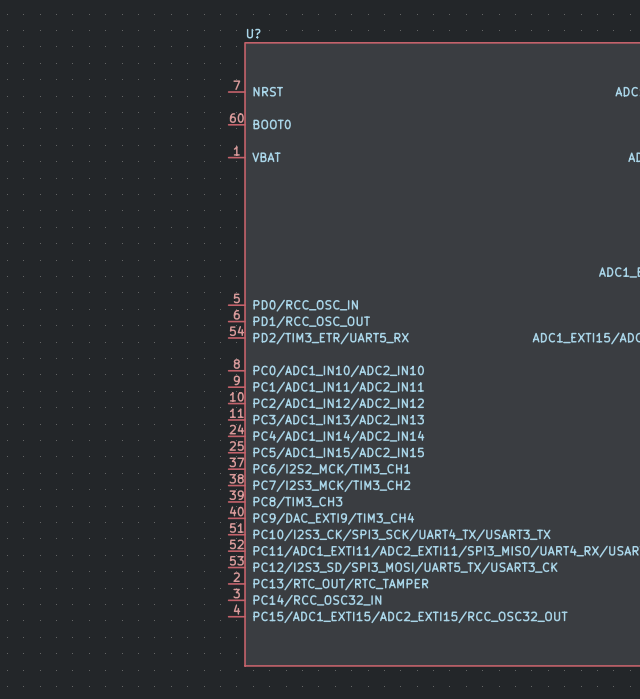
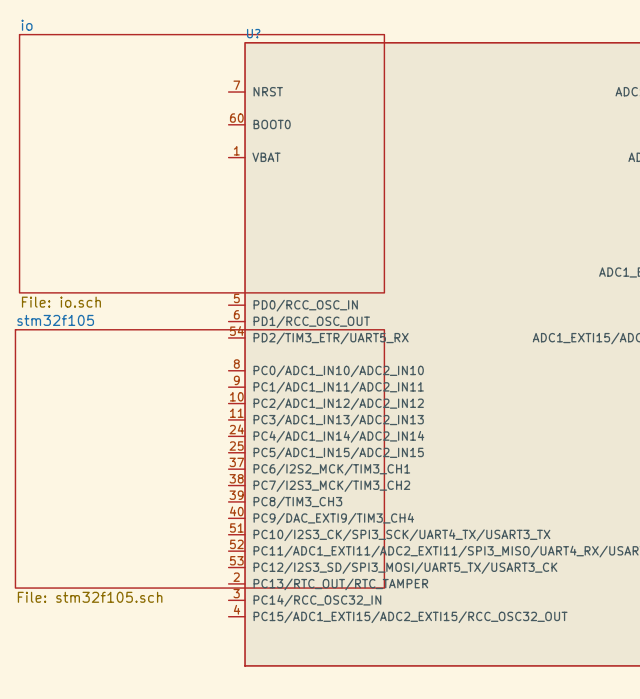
sheet io: none -> File: io.sch (201, 163)
sheet stm32f105: none -> File: stm32f105.sch (199, 458)

